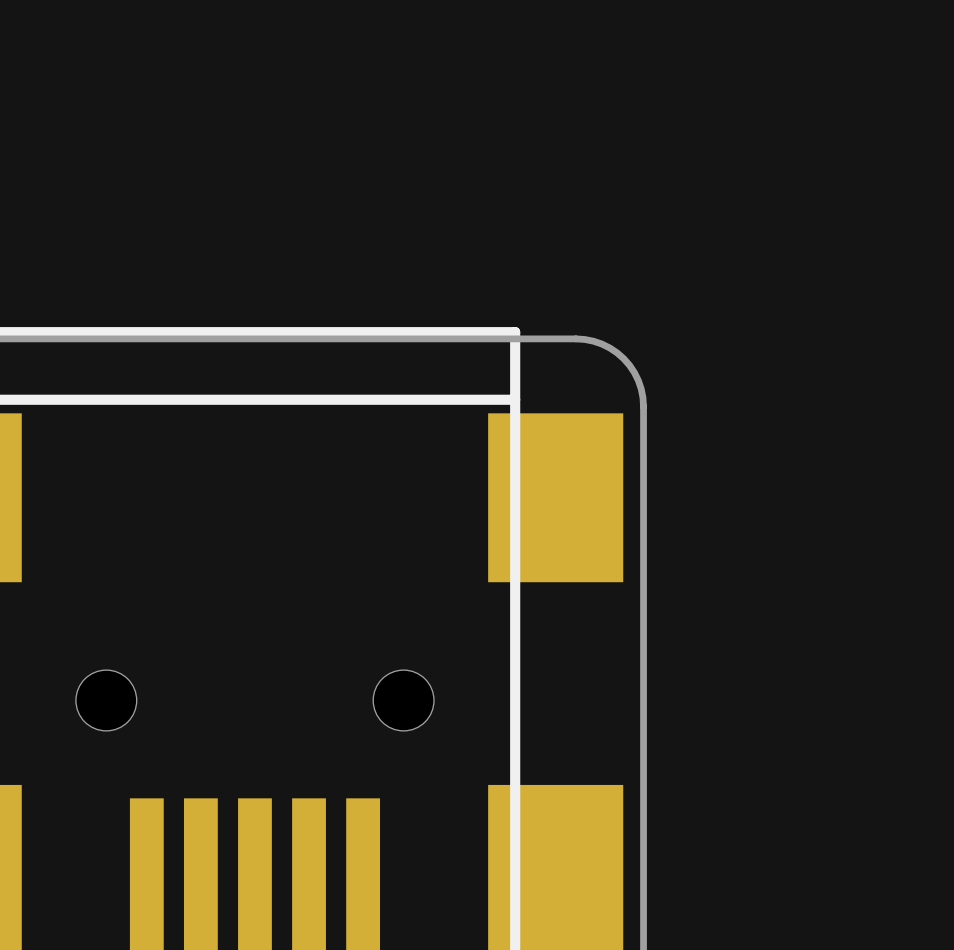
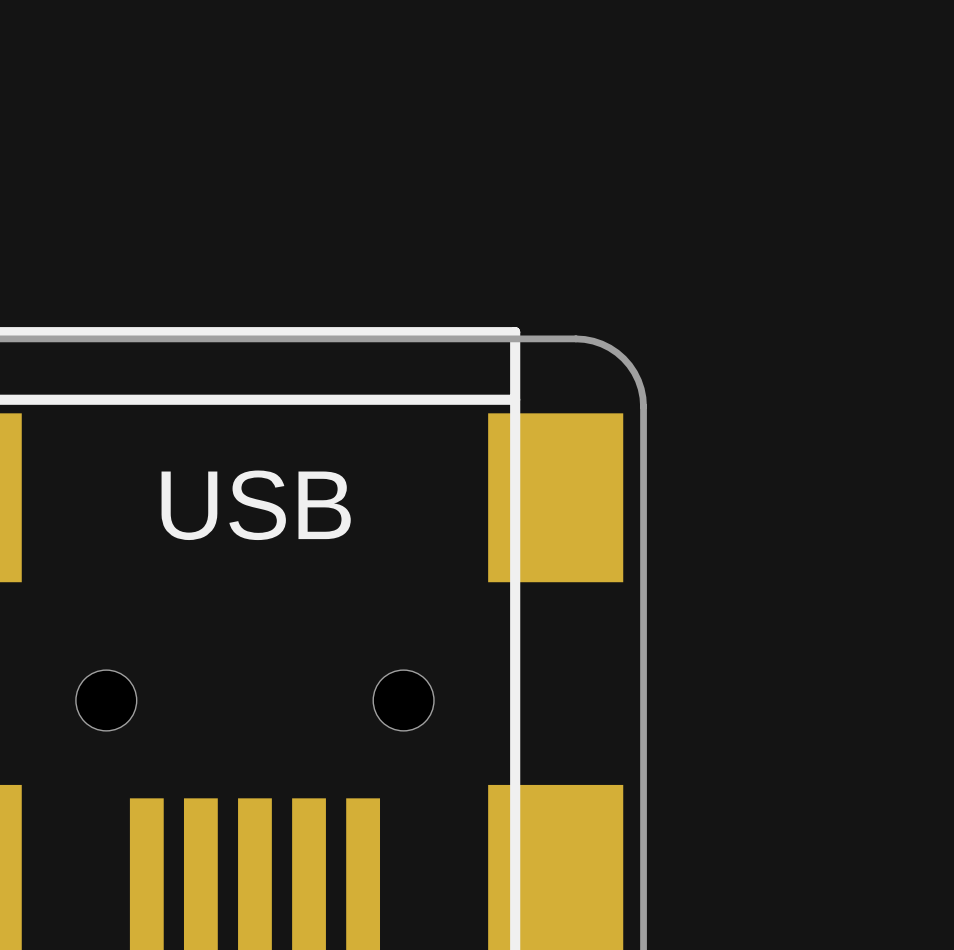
text: none -> USB (256, 505)

